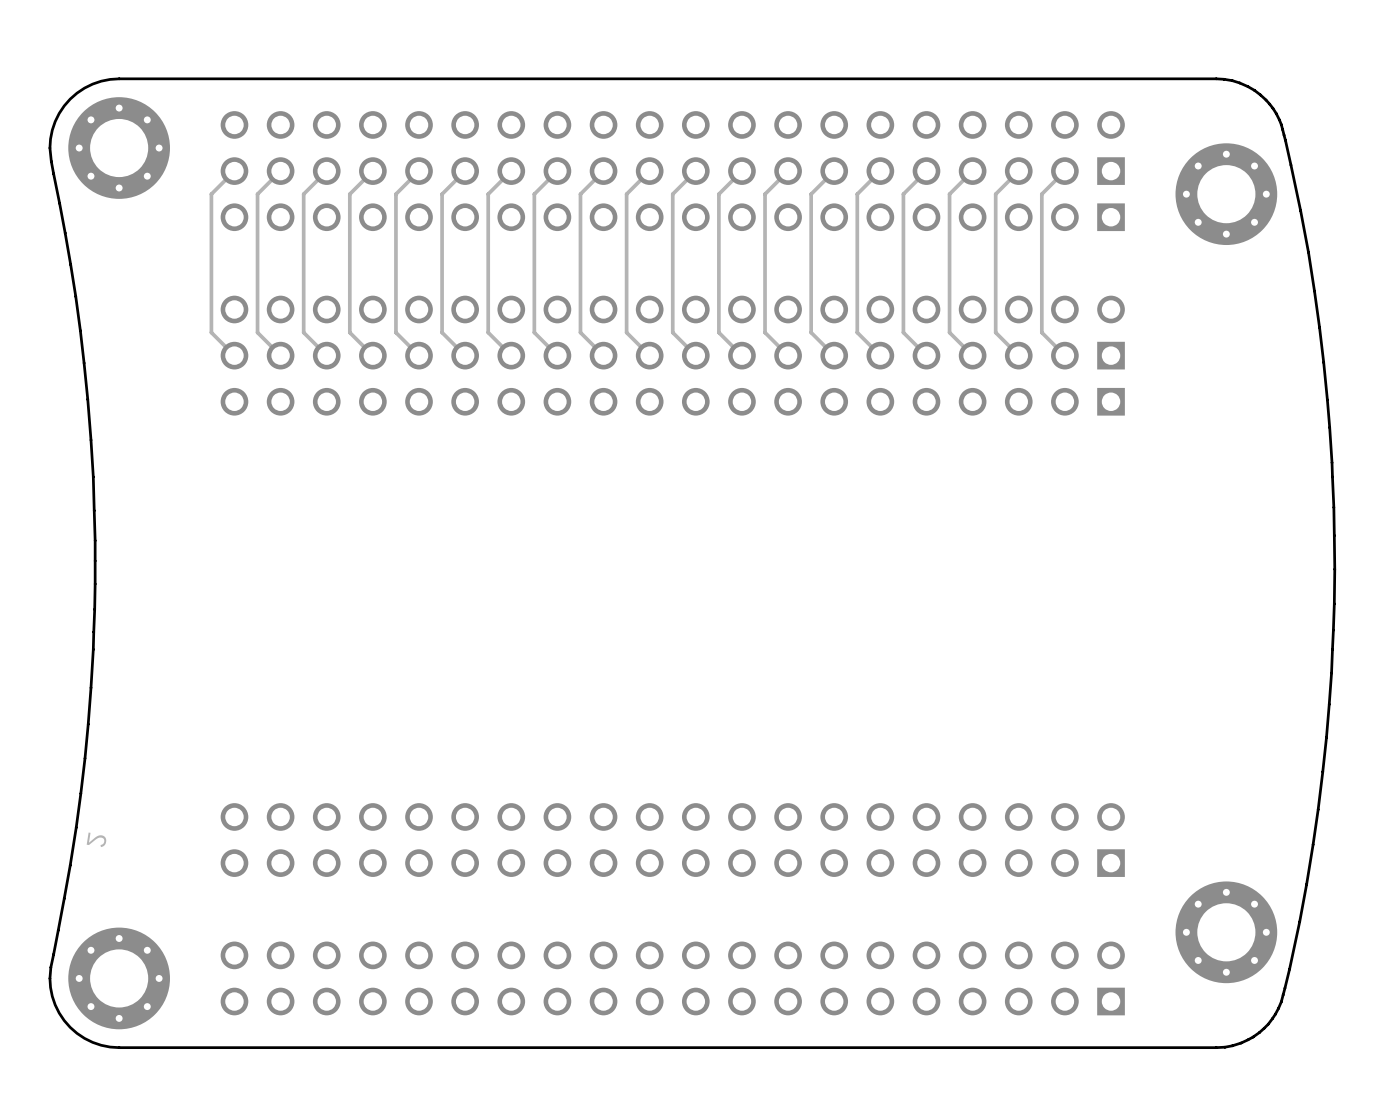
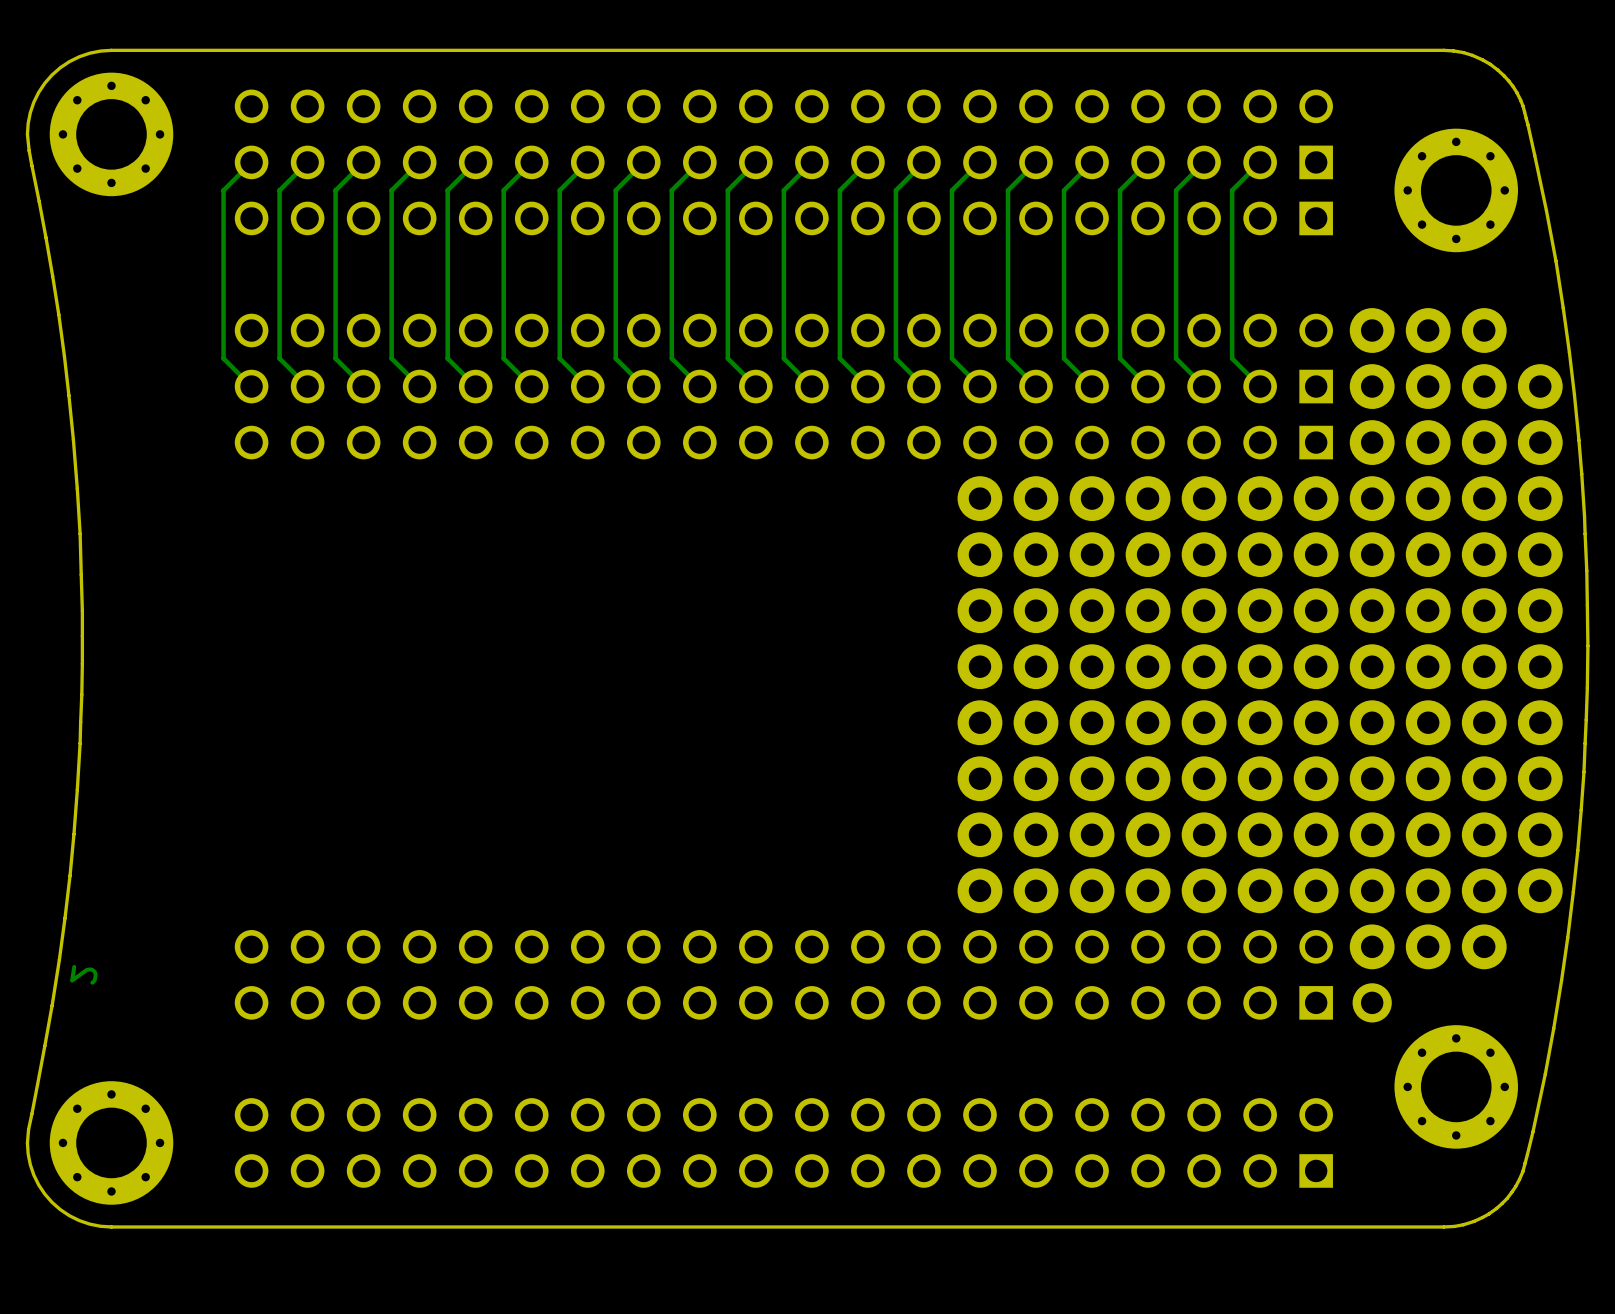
part: none -> (1260, 665)

